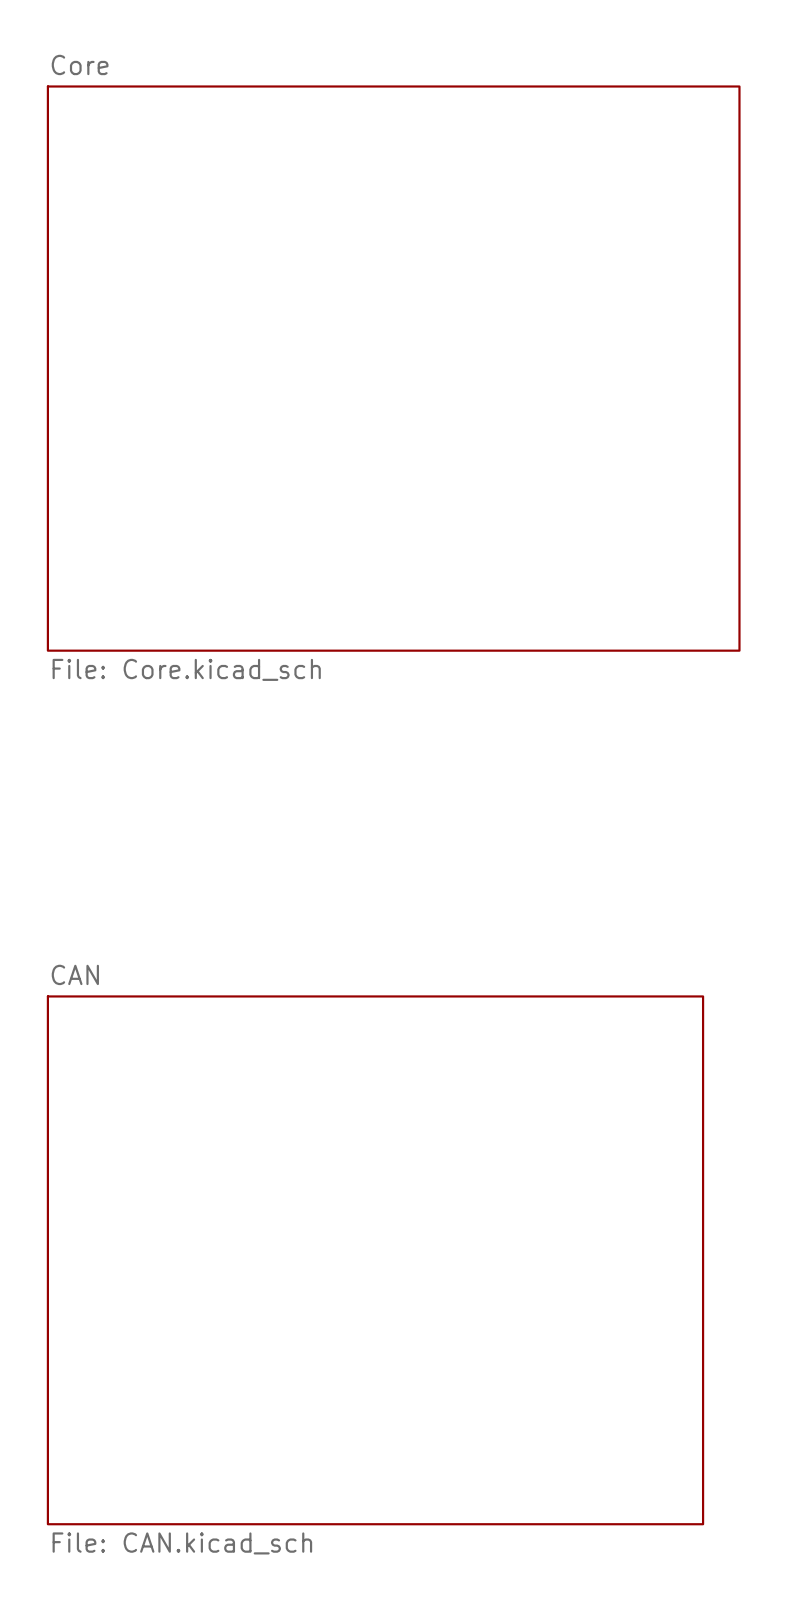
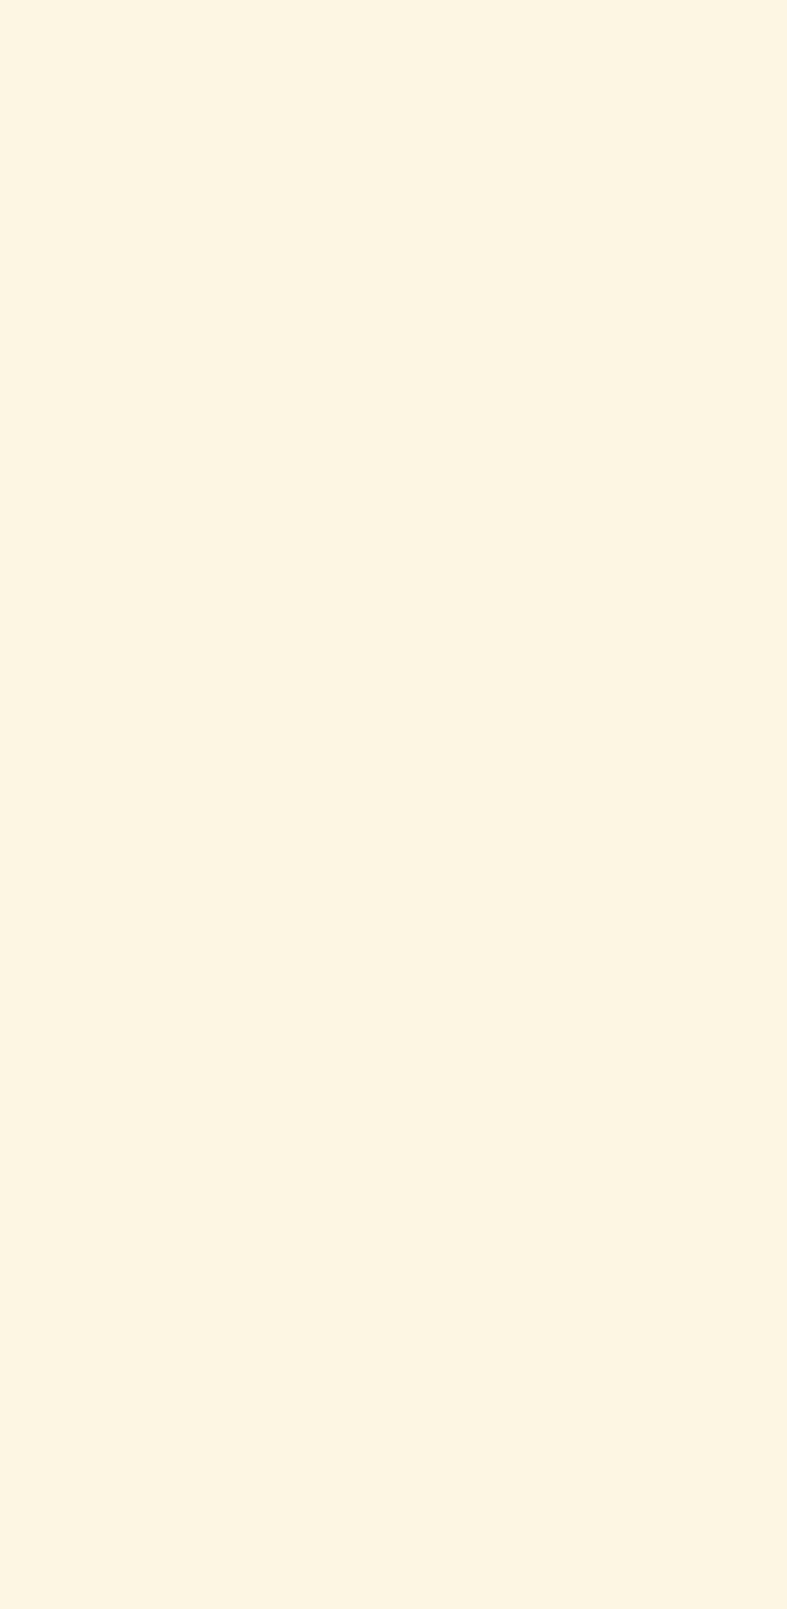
sheet Core: File: Core.kicad_sch (393, 368) -> none
sheet CAN: File: CAN.kicad_sch (375, 1260) -> none

